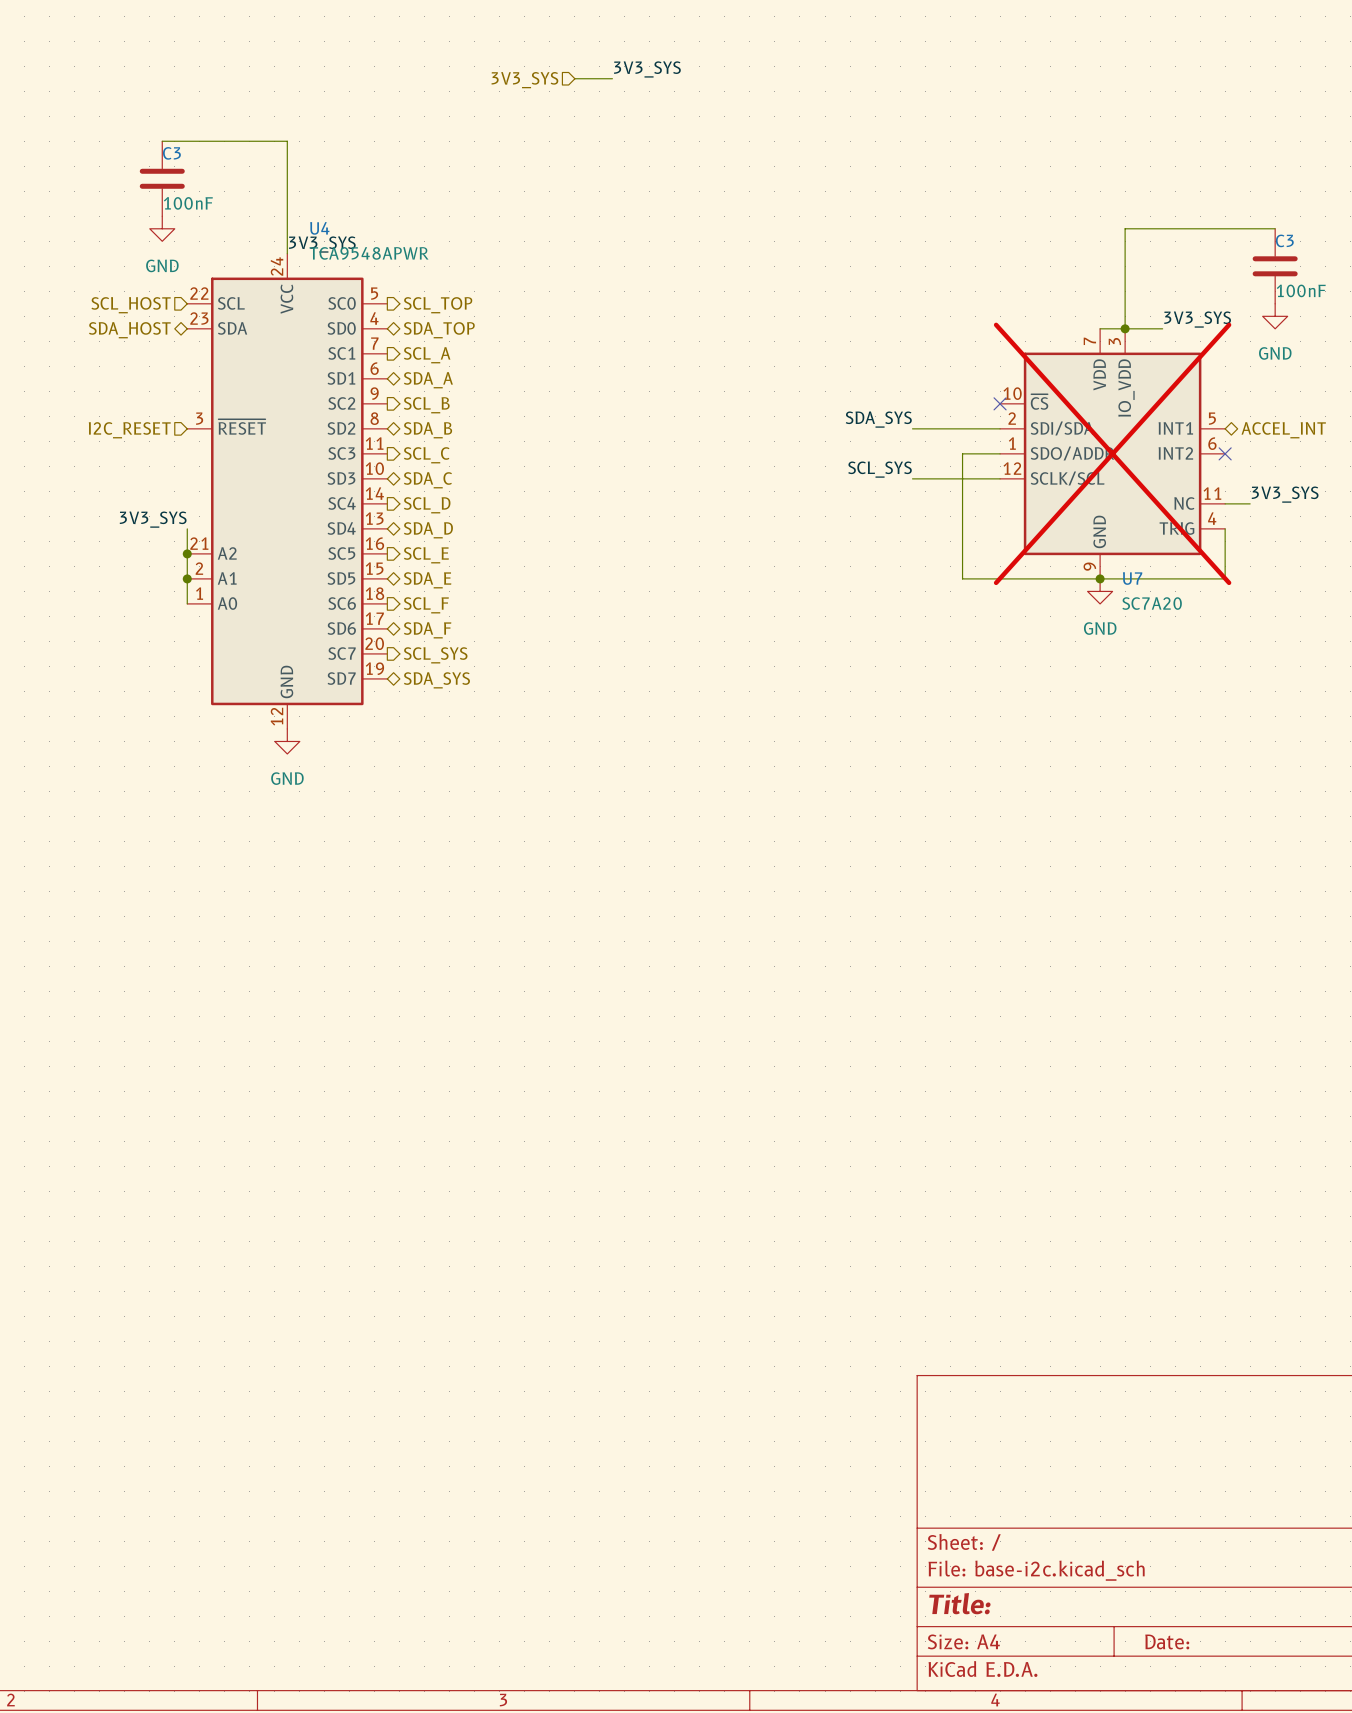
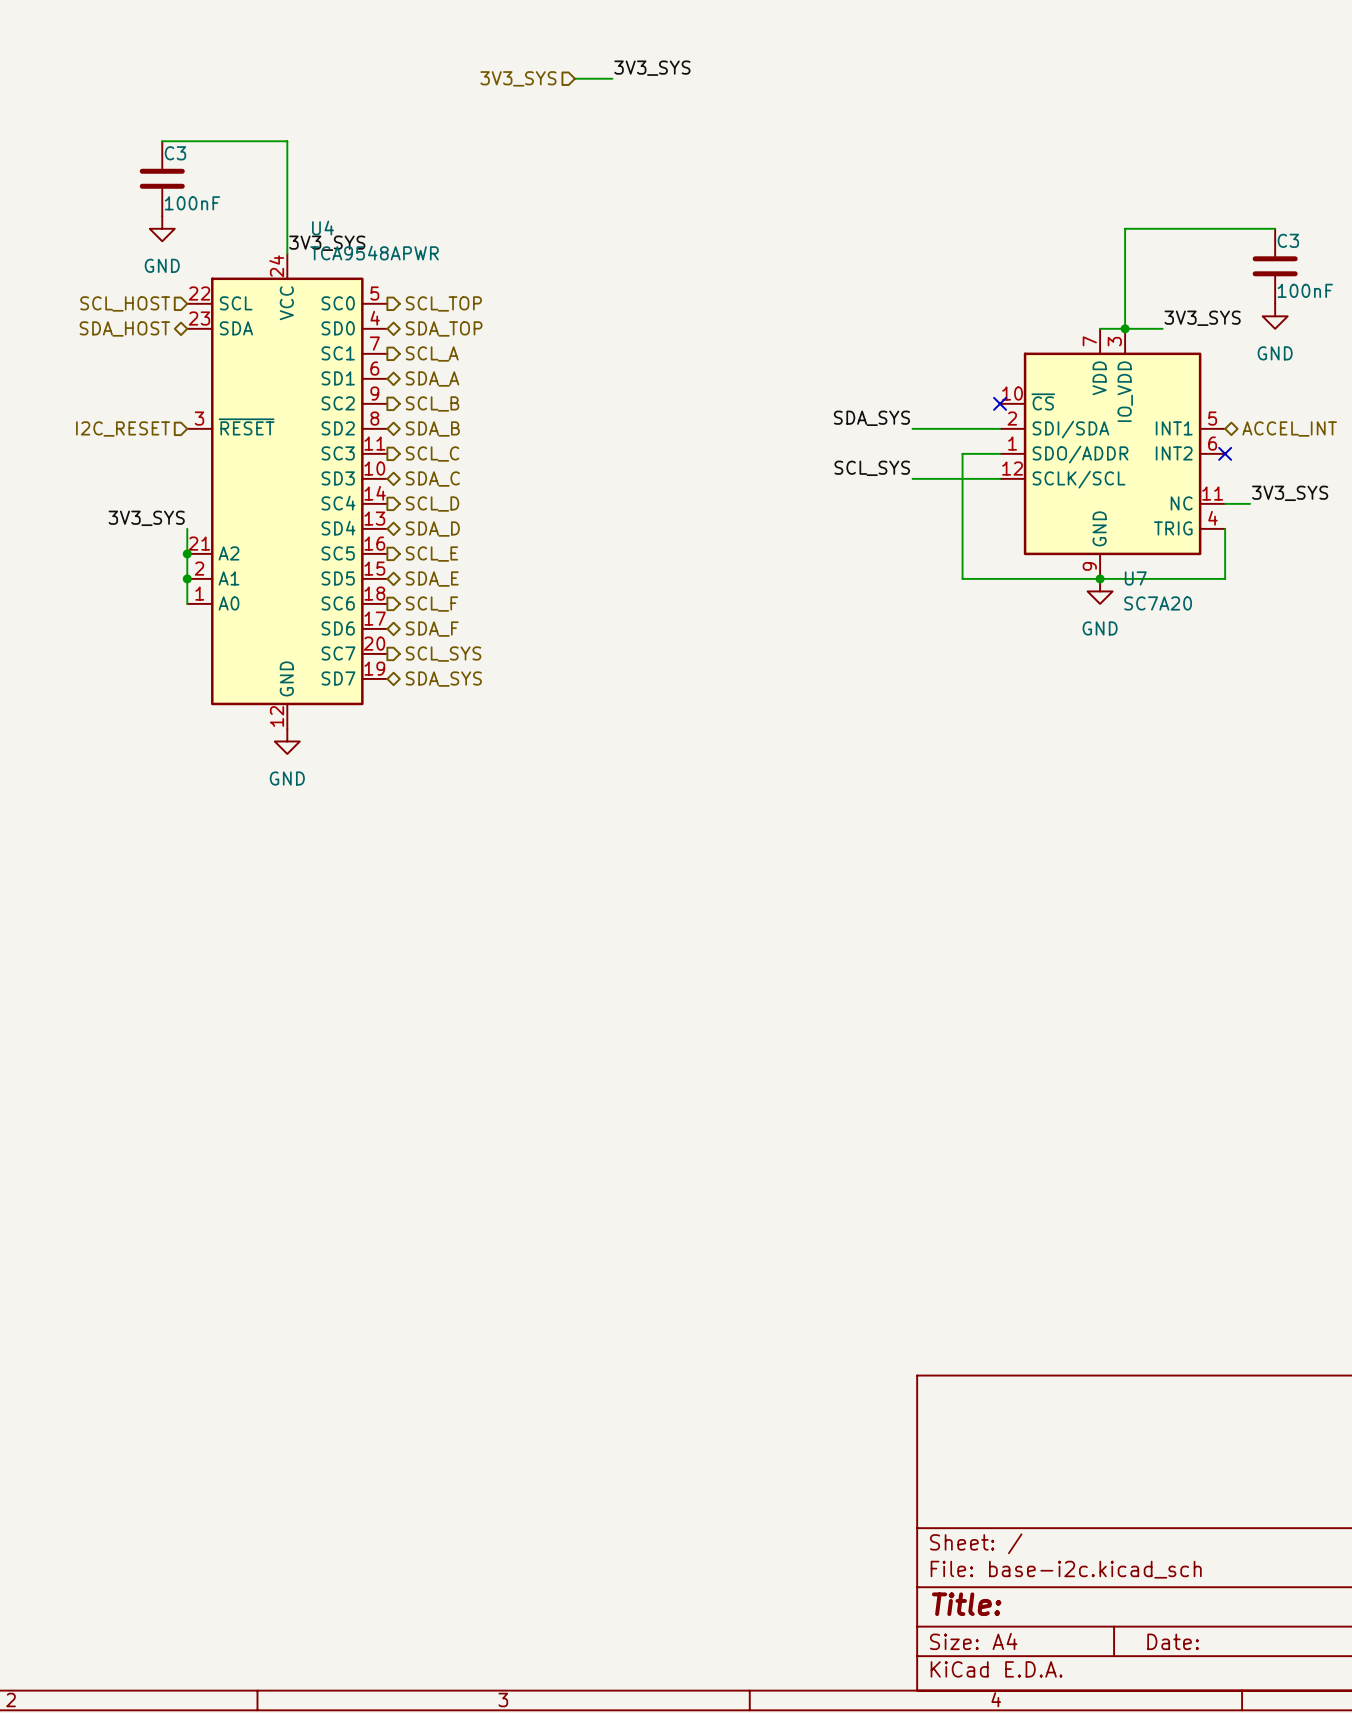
U7 do-not-place cross: (1112, 453) -> none

